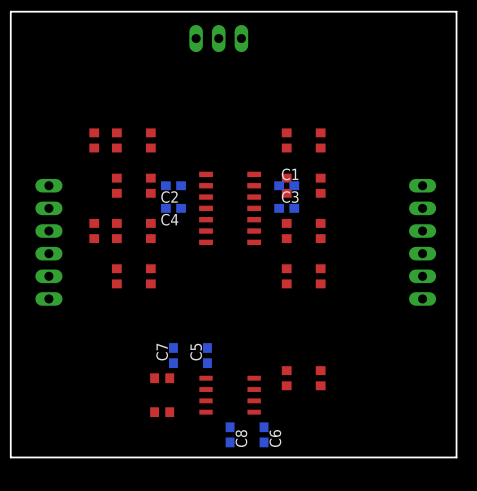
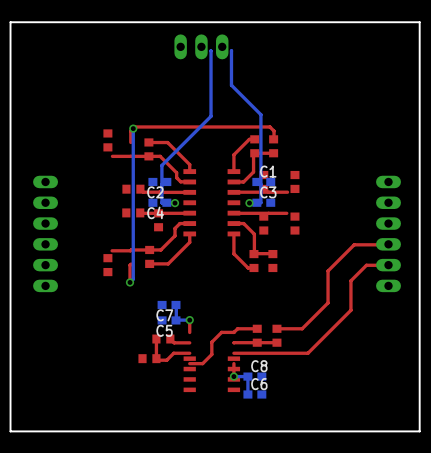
bottom track: none -> (210, 50) (211, 116) (161, 165) (161, 202) (175, 203)
bottom track: none -> (231, 50) (231, 85) (260, 114) (260, 202) (249, 203)
bottom track: none -> (133, 128) (133, 279) (130, 282)
via: none -> (133, 128)
top track: none -> (254, 139) (249, 139) (233, 154) (233, 171)
top track: none -> (273, 139) (274, 131) (269, 126) (134, 126) (130, 131) (130, 142)
part: (94, 140) -> none
part position: (150, 140) -> (148, 149)
part: (286, 140) -> none
part: (320, 140) -> none
top track: none -> (148, 142) (167, 142) (189, 164) (189, 171)
part: none -> (254, 146)
part: none -> (273, 146)
top track: none -> (273, 153) (254, 153) (253, 171) (243, 181) (233, 181)
top track: none -> (112, 156) (160, 156) (176, 172) (176, 177) (180, 181) (189, 181)
part: (116, 185) -> none
part rotation: 0° (150, 185) -> 90° clockwise (133, 189)
top track: none -> (140, 189) (143, 192) (189, 192)
top track: none -> (287, 192) (233, 192)
via: none -> (175, 203)
via: none -> (249, 203)
part: none -> (133, 212)
top track: none -> (140, 212) (189, 213)
top track: none -> (233, 213) (286, 213)
part: none -> (158, 220)
part: (94, 231) -> none
part: (116, 231) -> none
part: (150, 231) -> none
top track: none -> (189, 223) (179, 223) (175, 228) (175, 235) (160, 249) (112, 250)
top track: none -> (233, 223) (243, 223) (254, 234) (254, 253)
top track: none -> (189, 233) (189, 242) (168, 263) (149, 263)
top track: none -> (233, 233) (233, 253) (248, 267) (253, 267)
top track: none -> (385, 244) (354, 244) (328, 271) (328, 302) (302, 328) (276, 328)
top track: none -> (254, 253) (272, 254)
part: none -> (253, 261)
part: none -> (272, 261)
top track: none -> (131, 264) (130, 282)
part position: (150, 276) -> (149, 256)
part: (286, 276) -> none
part: (320, 276) -> none
top track: none -> (385, 265) (366, 265) (350, 280) (350, 310) (307, 353) (233, 353)
via: none -> (130, 282)
bottom track: none -> (175, 304) (176, 320)
bottom track: none -> (189, 320) (176, 320)
top track: none -> (189, 320) (189, 332)
via: none -> (189, 320)
top track: none -> (257, 328) (237, 328) (233, 332)
top track: none -> (233, 332) (221, 332) (211, 342) (211, 354) (202, 363) (189, 363)
C7 name position: C7 (162, 352) -> C7 (164, 315)
C5 name position: C5 (196, 352) -> C5 (164, 330)
part: none -> (257, 335)
part: none -> (276, 335)
C7 rotation: 0° (173, 355) -> 90° clockwise (169, 304)
C7 position: (173, 355) -> (169, 304)
C5 rotation: 0° (207, 355) -> 90° clockwise (169, 320)
C5 position: (207, 355) -> (169, 320)
top track: none -> (156, 339) (156, 360) (166, 360) (173, 353) (189, 353)
part: none -> (163, 339)
top track: none -> (170, 339) (174, 342) (189, 342)
top track: none -> (276, 342) (233, 342)
part: (286, 378) -> none
part: (320, 378) -> none
top track: none -> (233, 363) (233, 376)
bottom track: none -> (233, 376) (247, 376) (247, 394)
via: none -> (233, 376)
part: (162, 412) -> none
C8 rotation: 0° (230, 434) -> 90° clockwise (254, 376)
C8 position: (230, 434) -> (254, 376)
C6 rotation: 0° (264, 434) -> 90° clockwise (254, 394)
C6 position: (264, 434) -> (254, 394)
C8 name position: C8 (241, 438) -> C8 (259, 366)
C6 name position: C6 (275, 438) -> C6 (259, 384)

